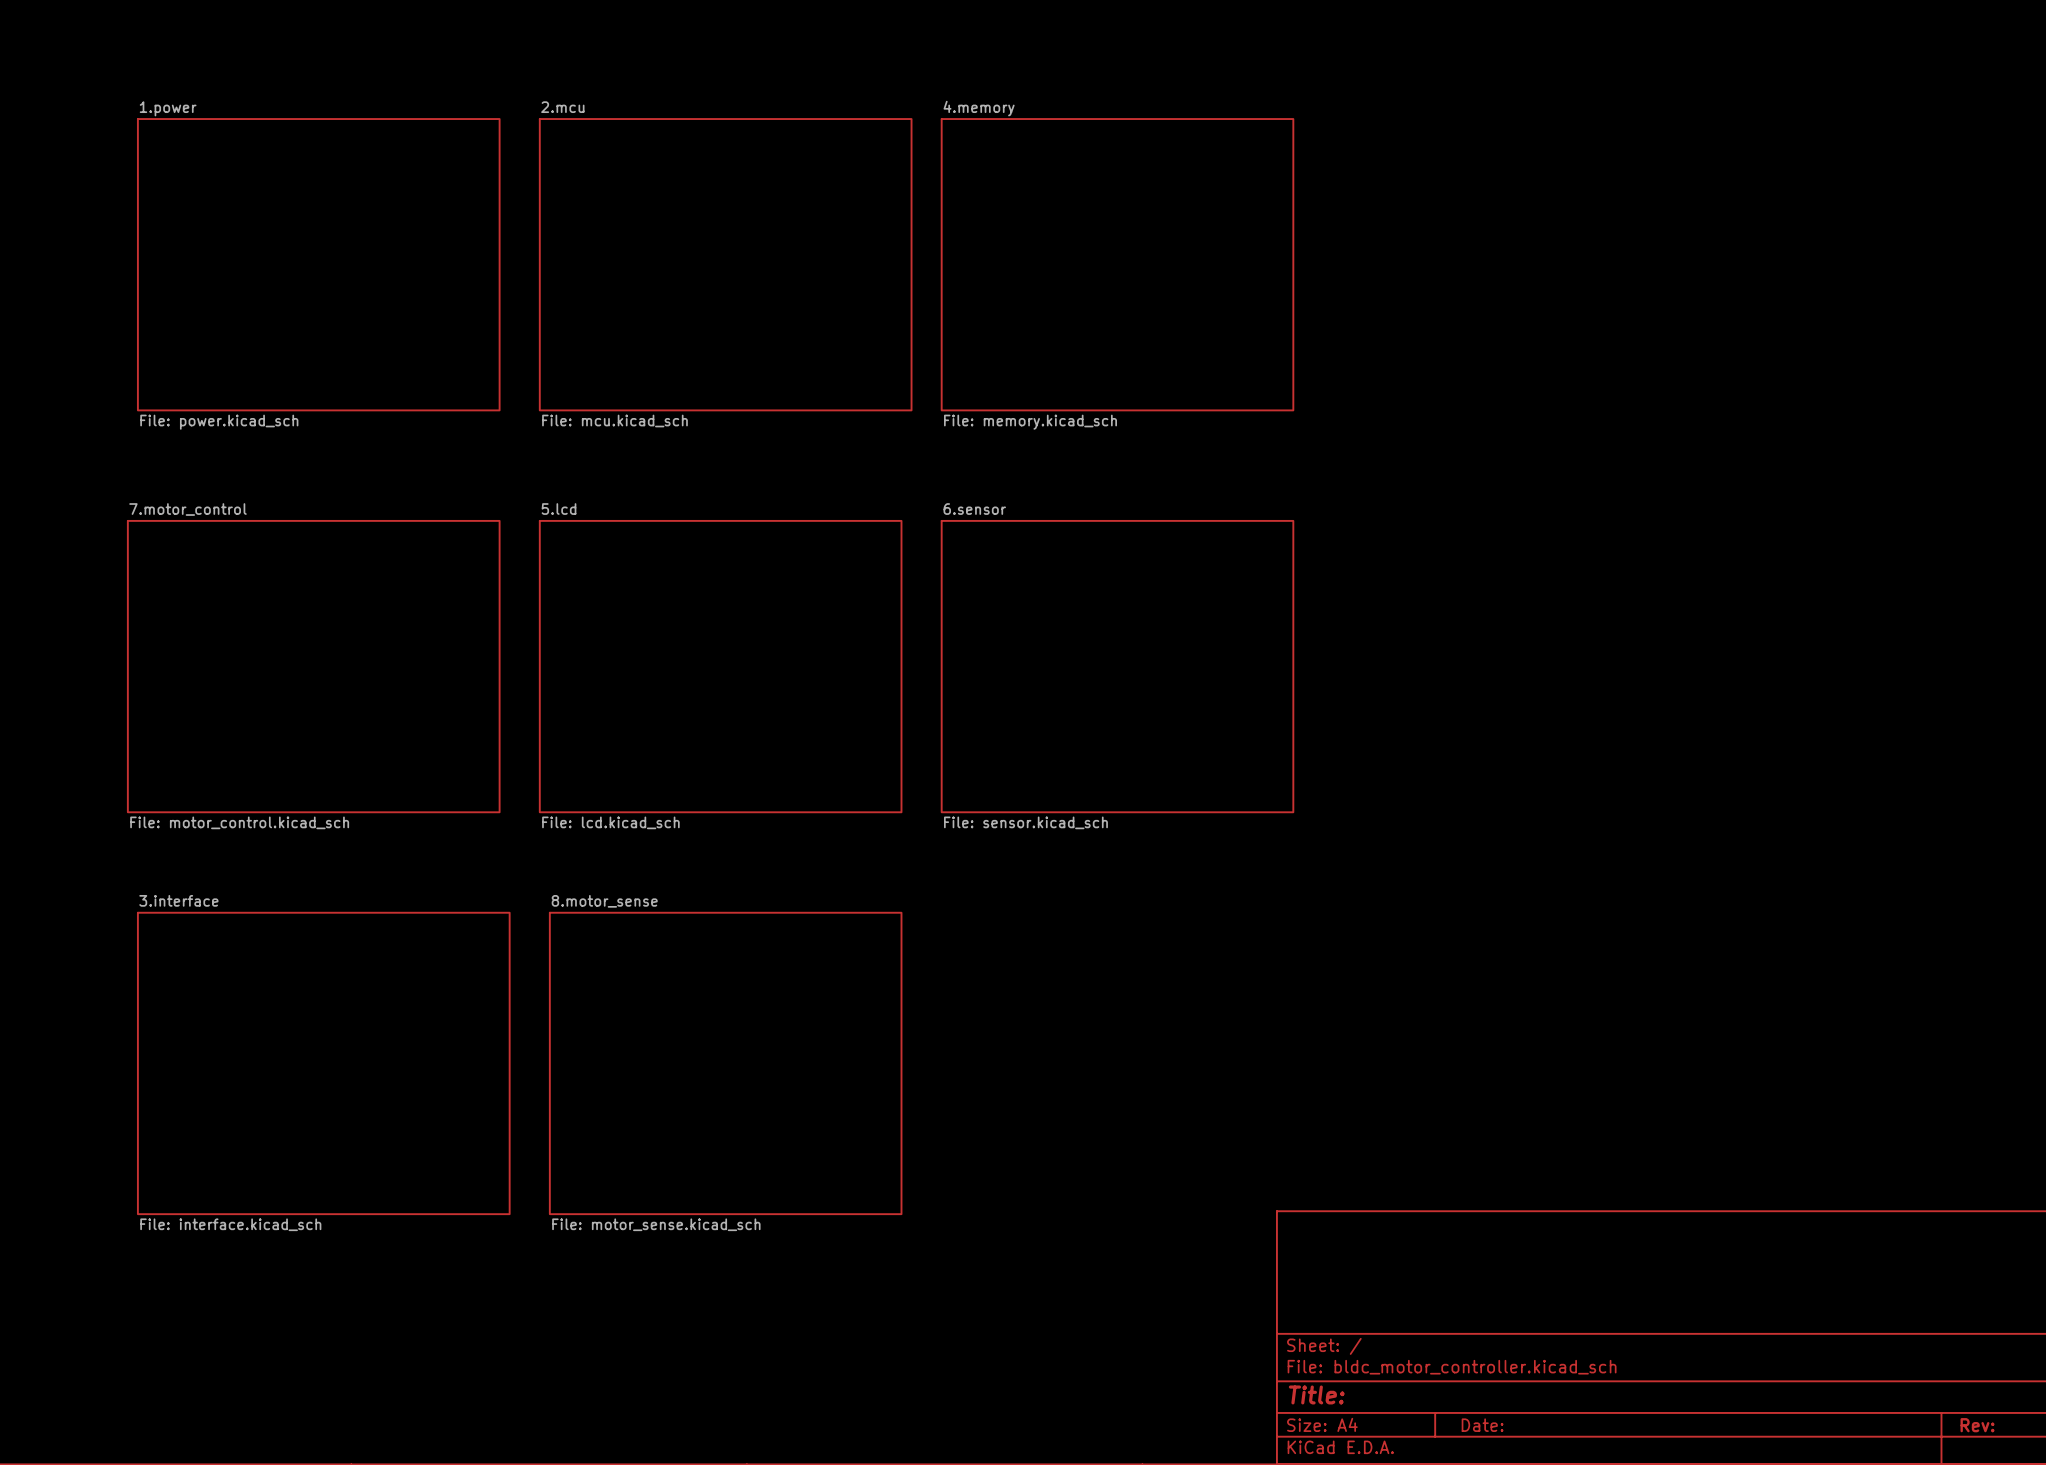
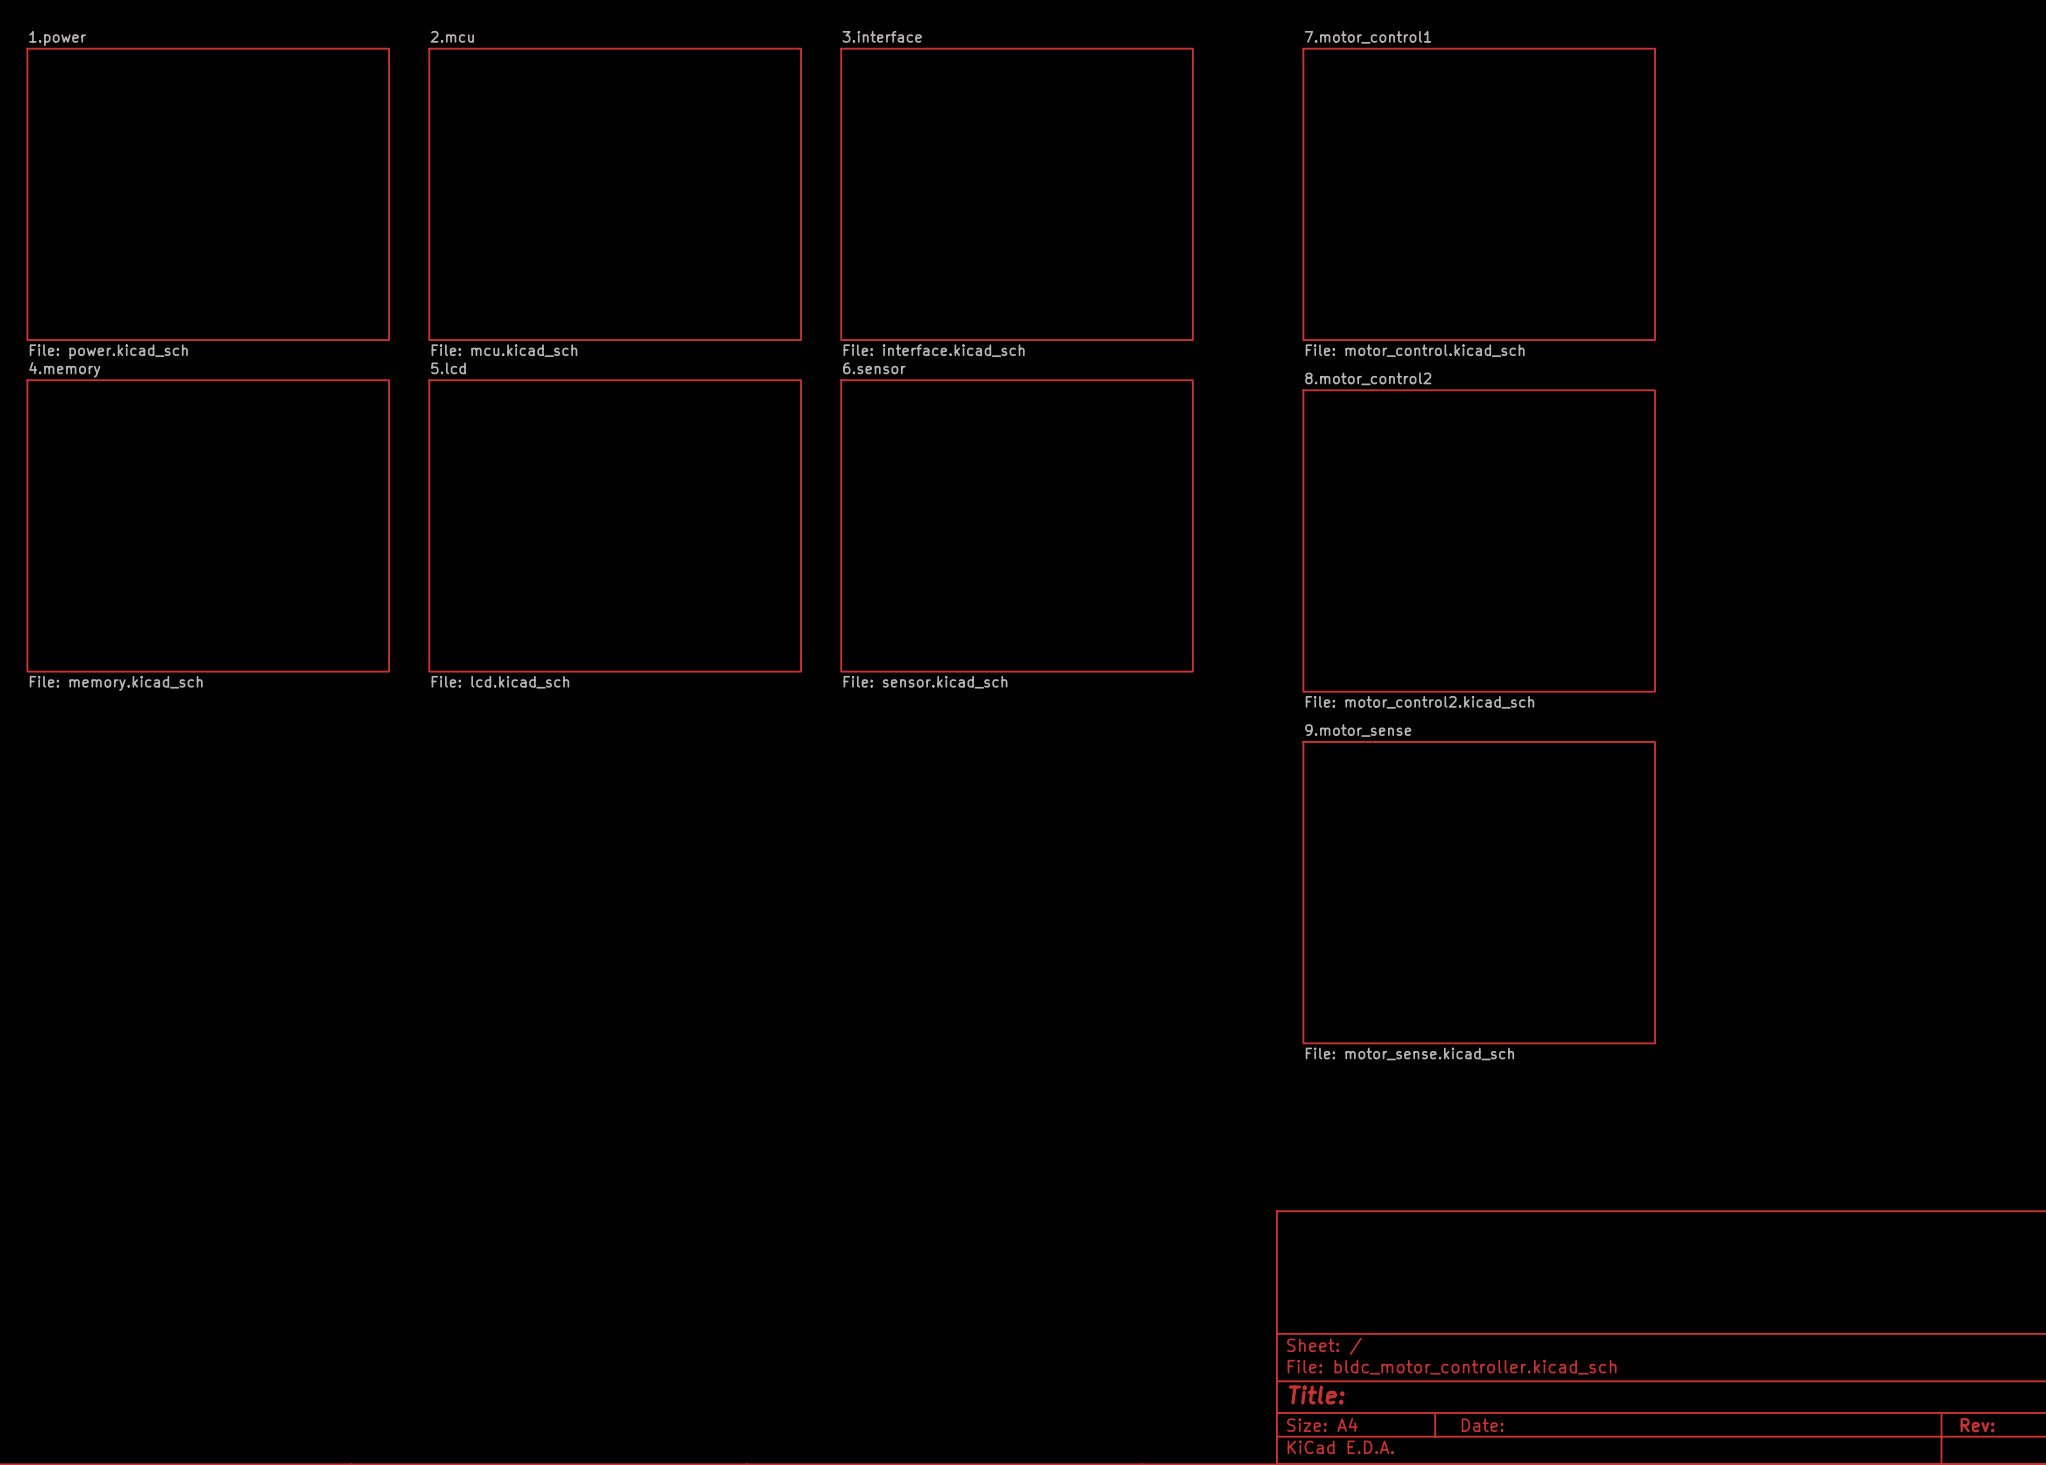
sheet 4.memory shape: [941, 118, 1294, 411] -> [26, 379, 390, 673]
sheet 7.motor_control1: none -> File: motor_control.kicad_sch (1479, 194)
sheet 1.power position: (318, 264) -> (208, 194)
sheet 2.mcu position: (725, 264) -> (615, 194)
sheet 5.lcd shape: [539, 520, 903, 813] -> [428, 379, 802, 673]
sheet 8.motor_control2: none -> File: motor_control2.kicad_sch (1479, 541)
sheet 7.motor_control: File: motor_control.kicad_sch (313, 666) -> none
sheet 6.sensor position: (1117, 666) -> (1017, 525)
sheet 9.motor_sense: none -> File: motor_sense.kicad_sch (1479, 892)
sheet 3.interface shape: [137, 912, 511, 1215] -> [840, 48, 1194, 341]
sheet 8.motor_sense: File: motor_sense.kicad_sch (725, 1063) -> none

